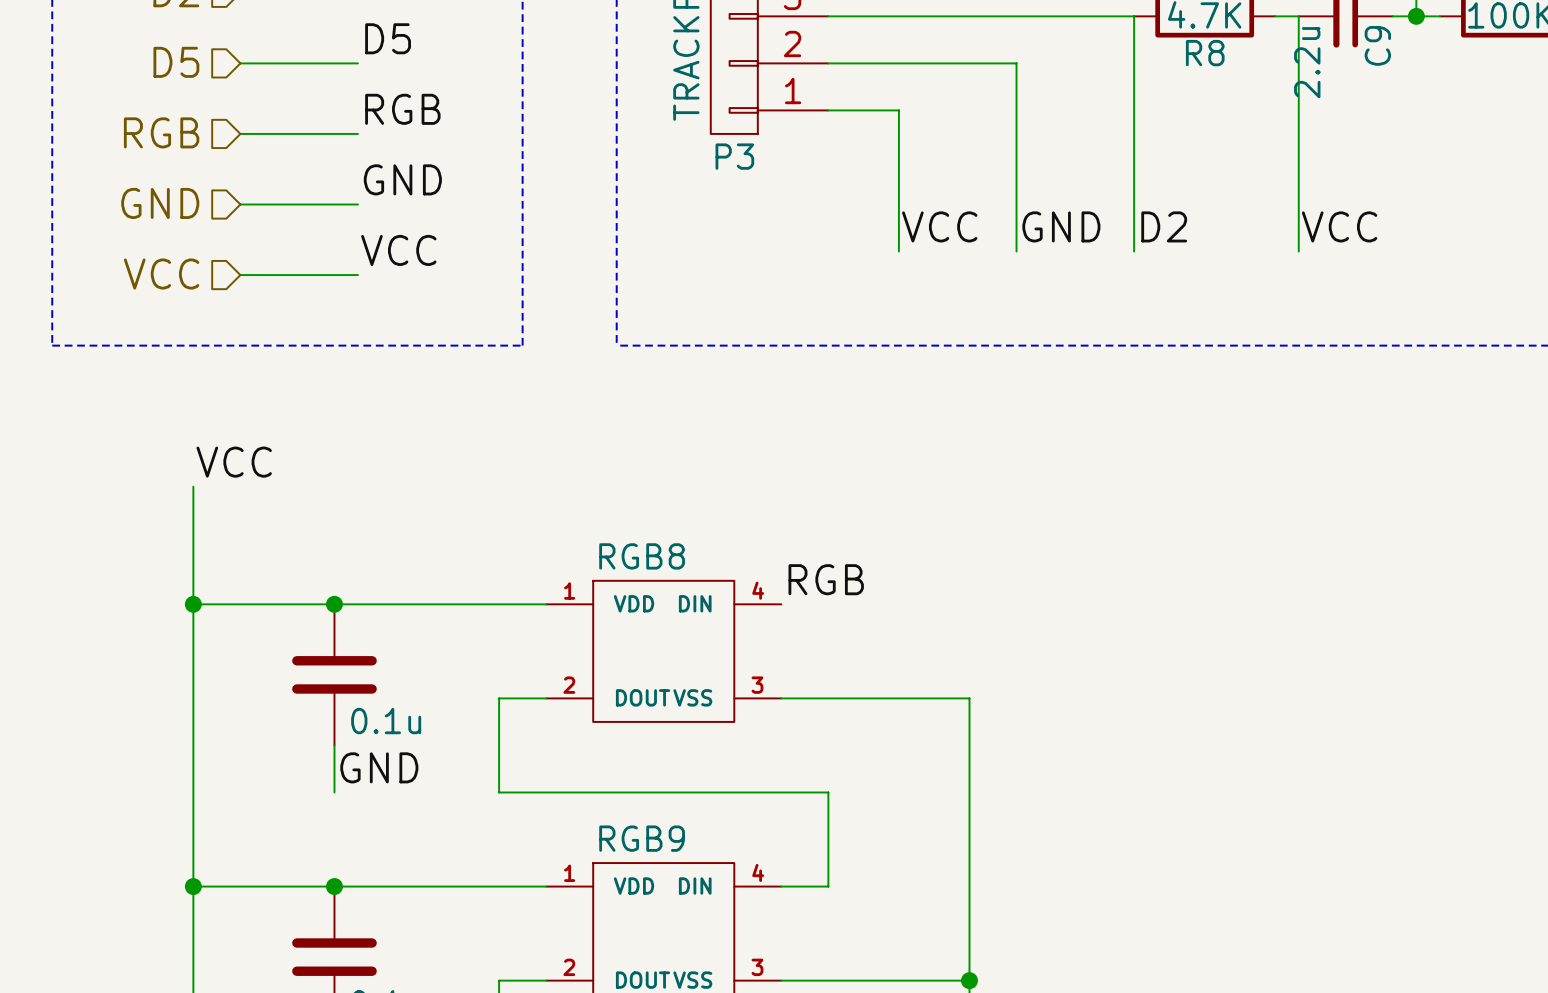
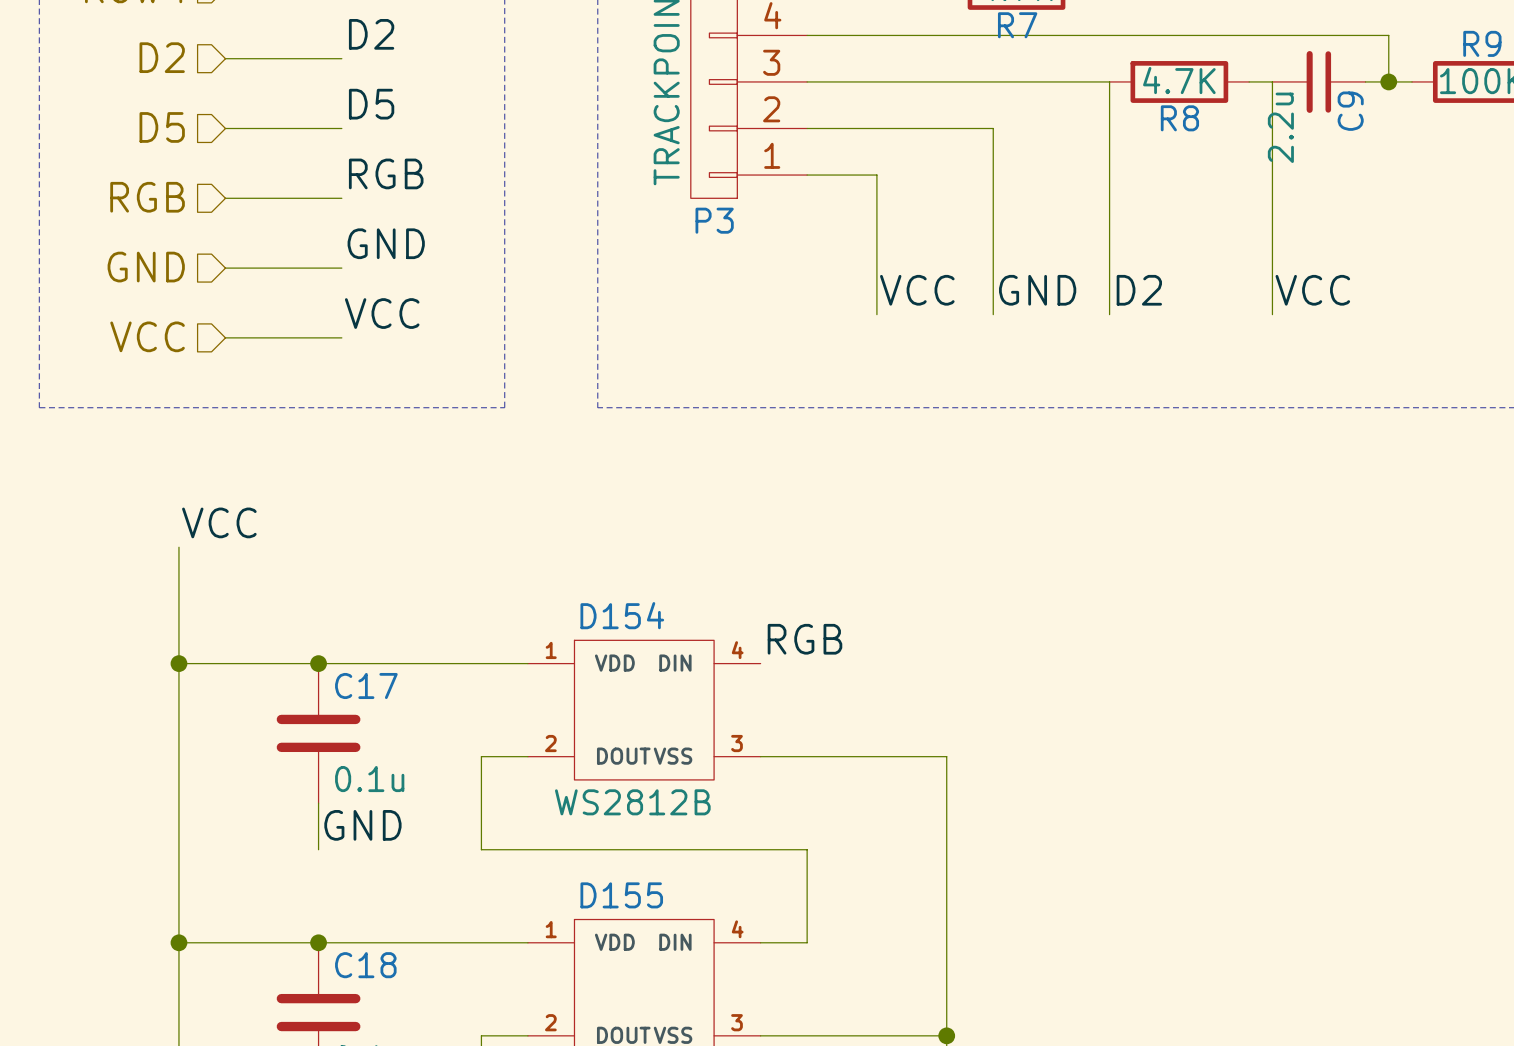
RGB8 name: RGB8 (642, 556) -> D154 (622, 615)
C17 name: none -> C17 (366, 685)
RGB8 value: none -> WS2812B (632, 802)
RGB9 name: RGB9 (642, 838) -> D155 (621, 895)
C18 name: none -> C18 (365, 965)

